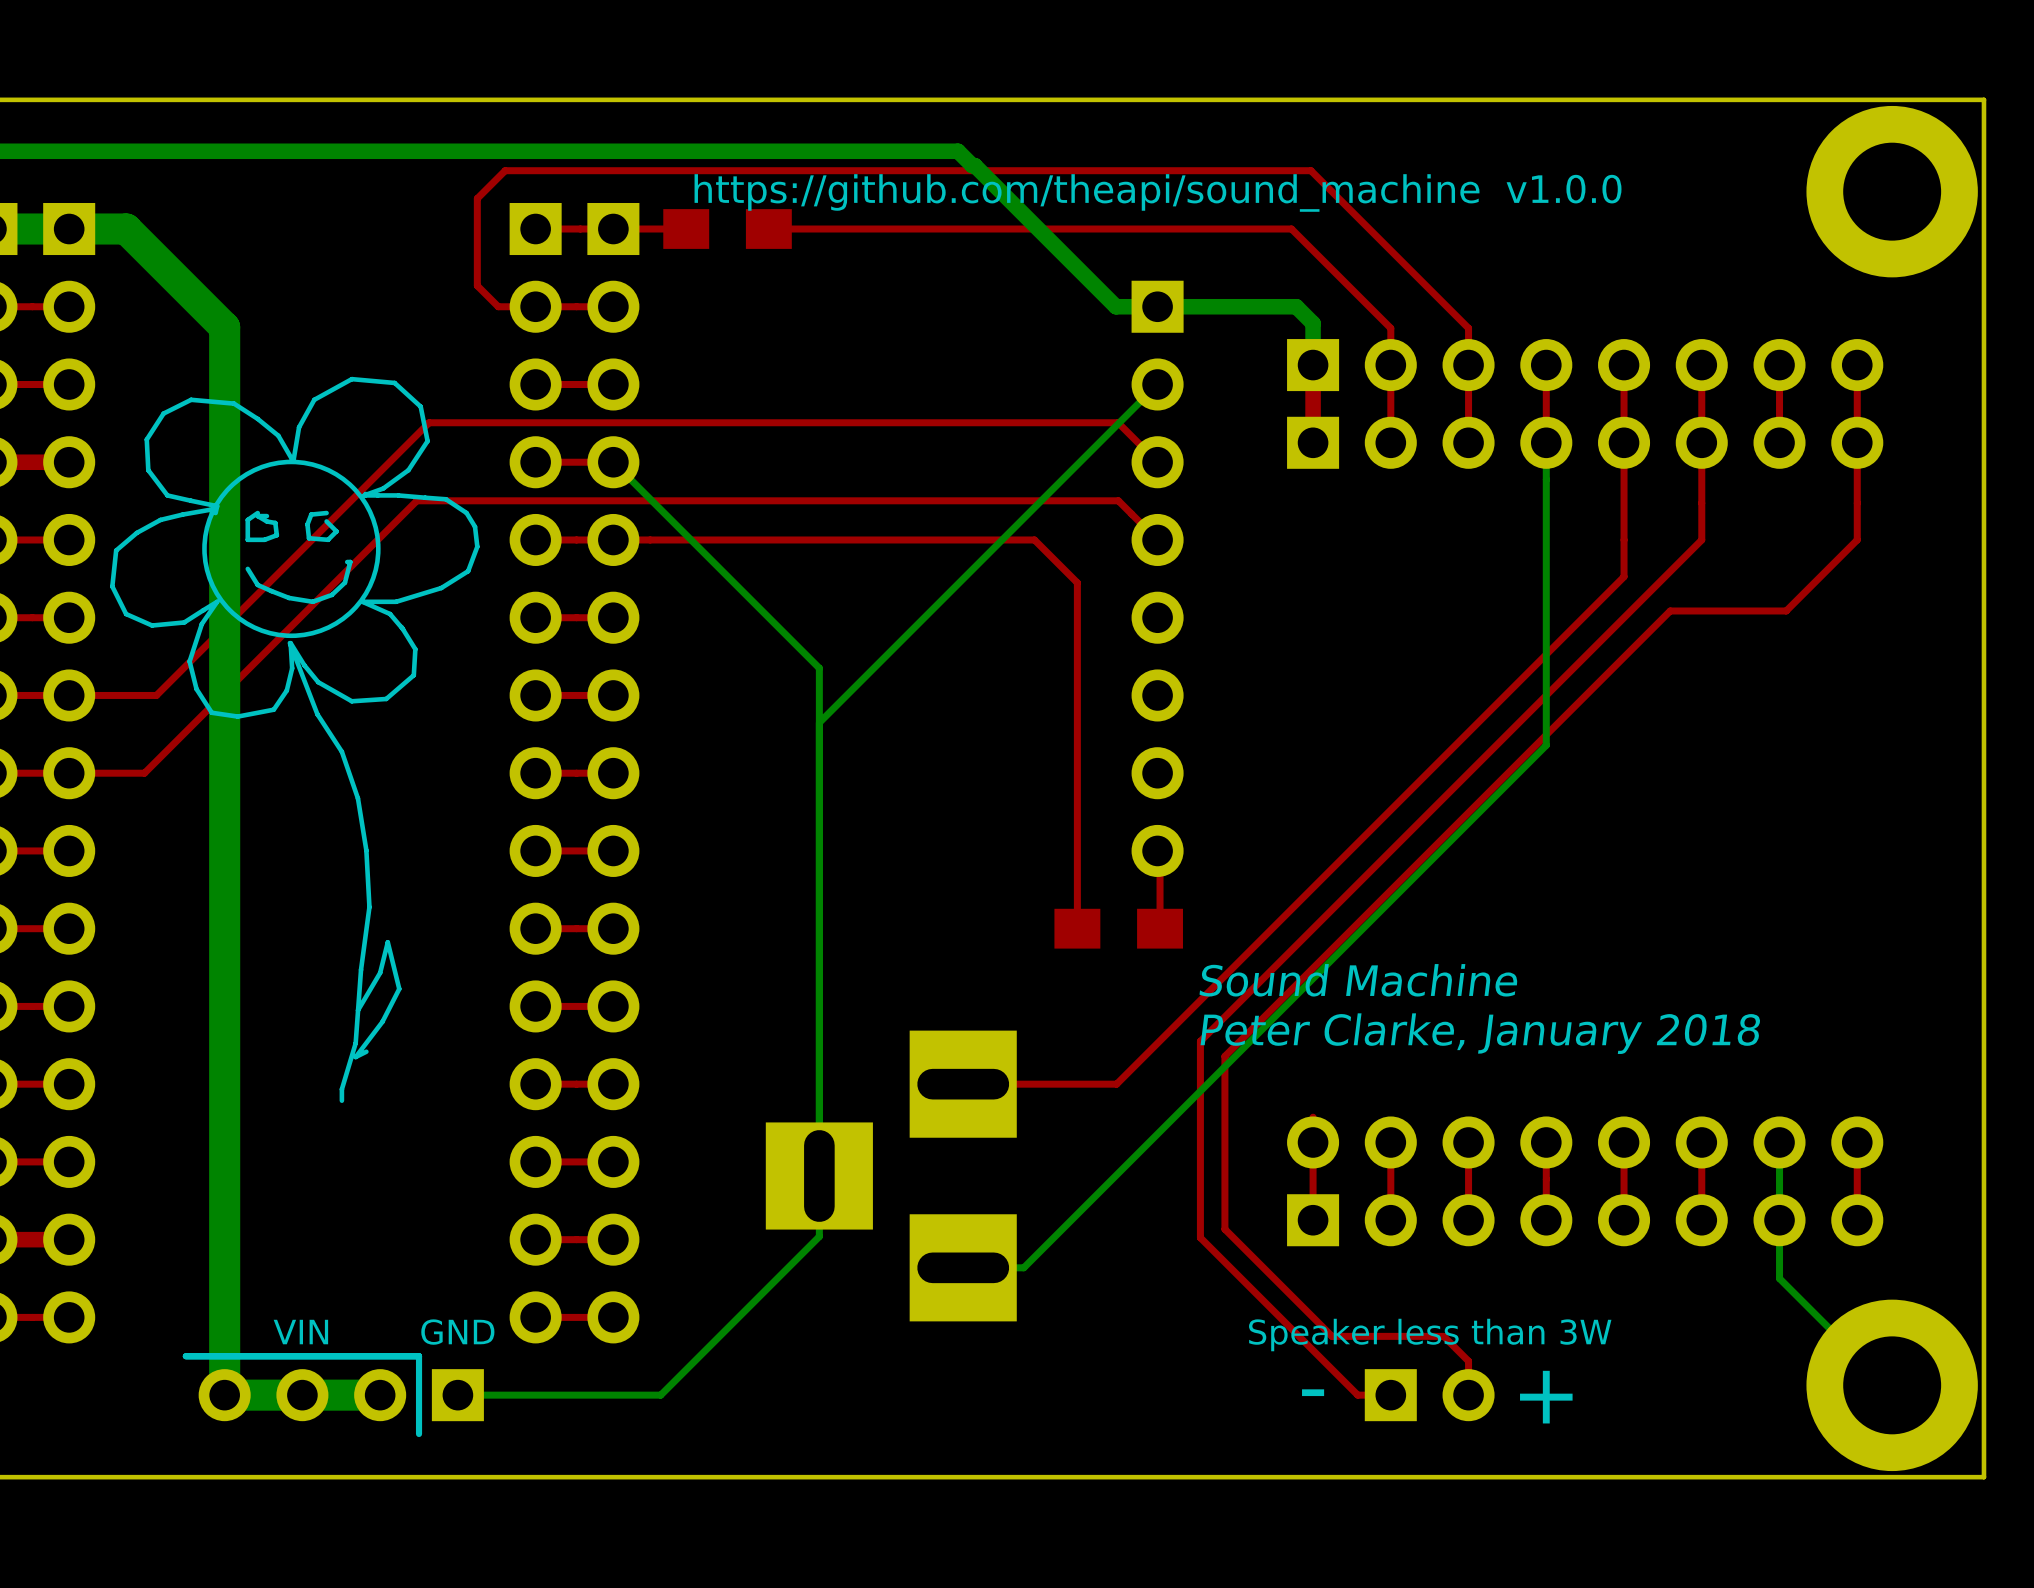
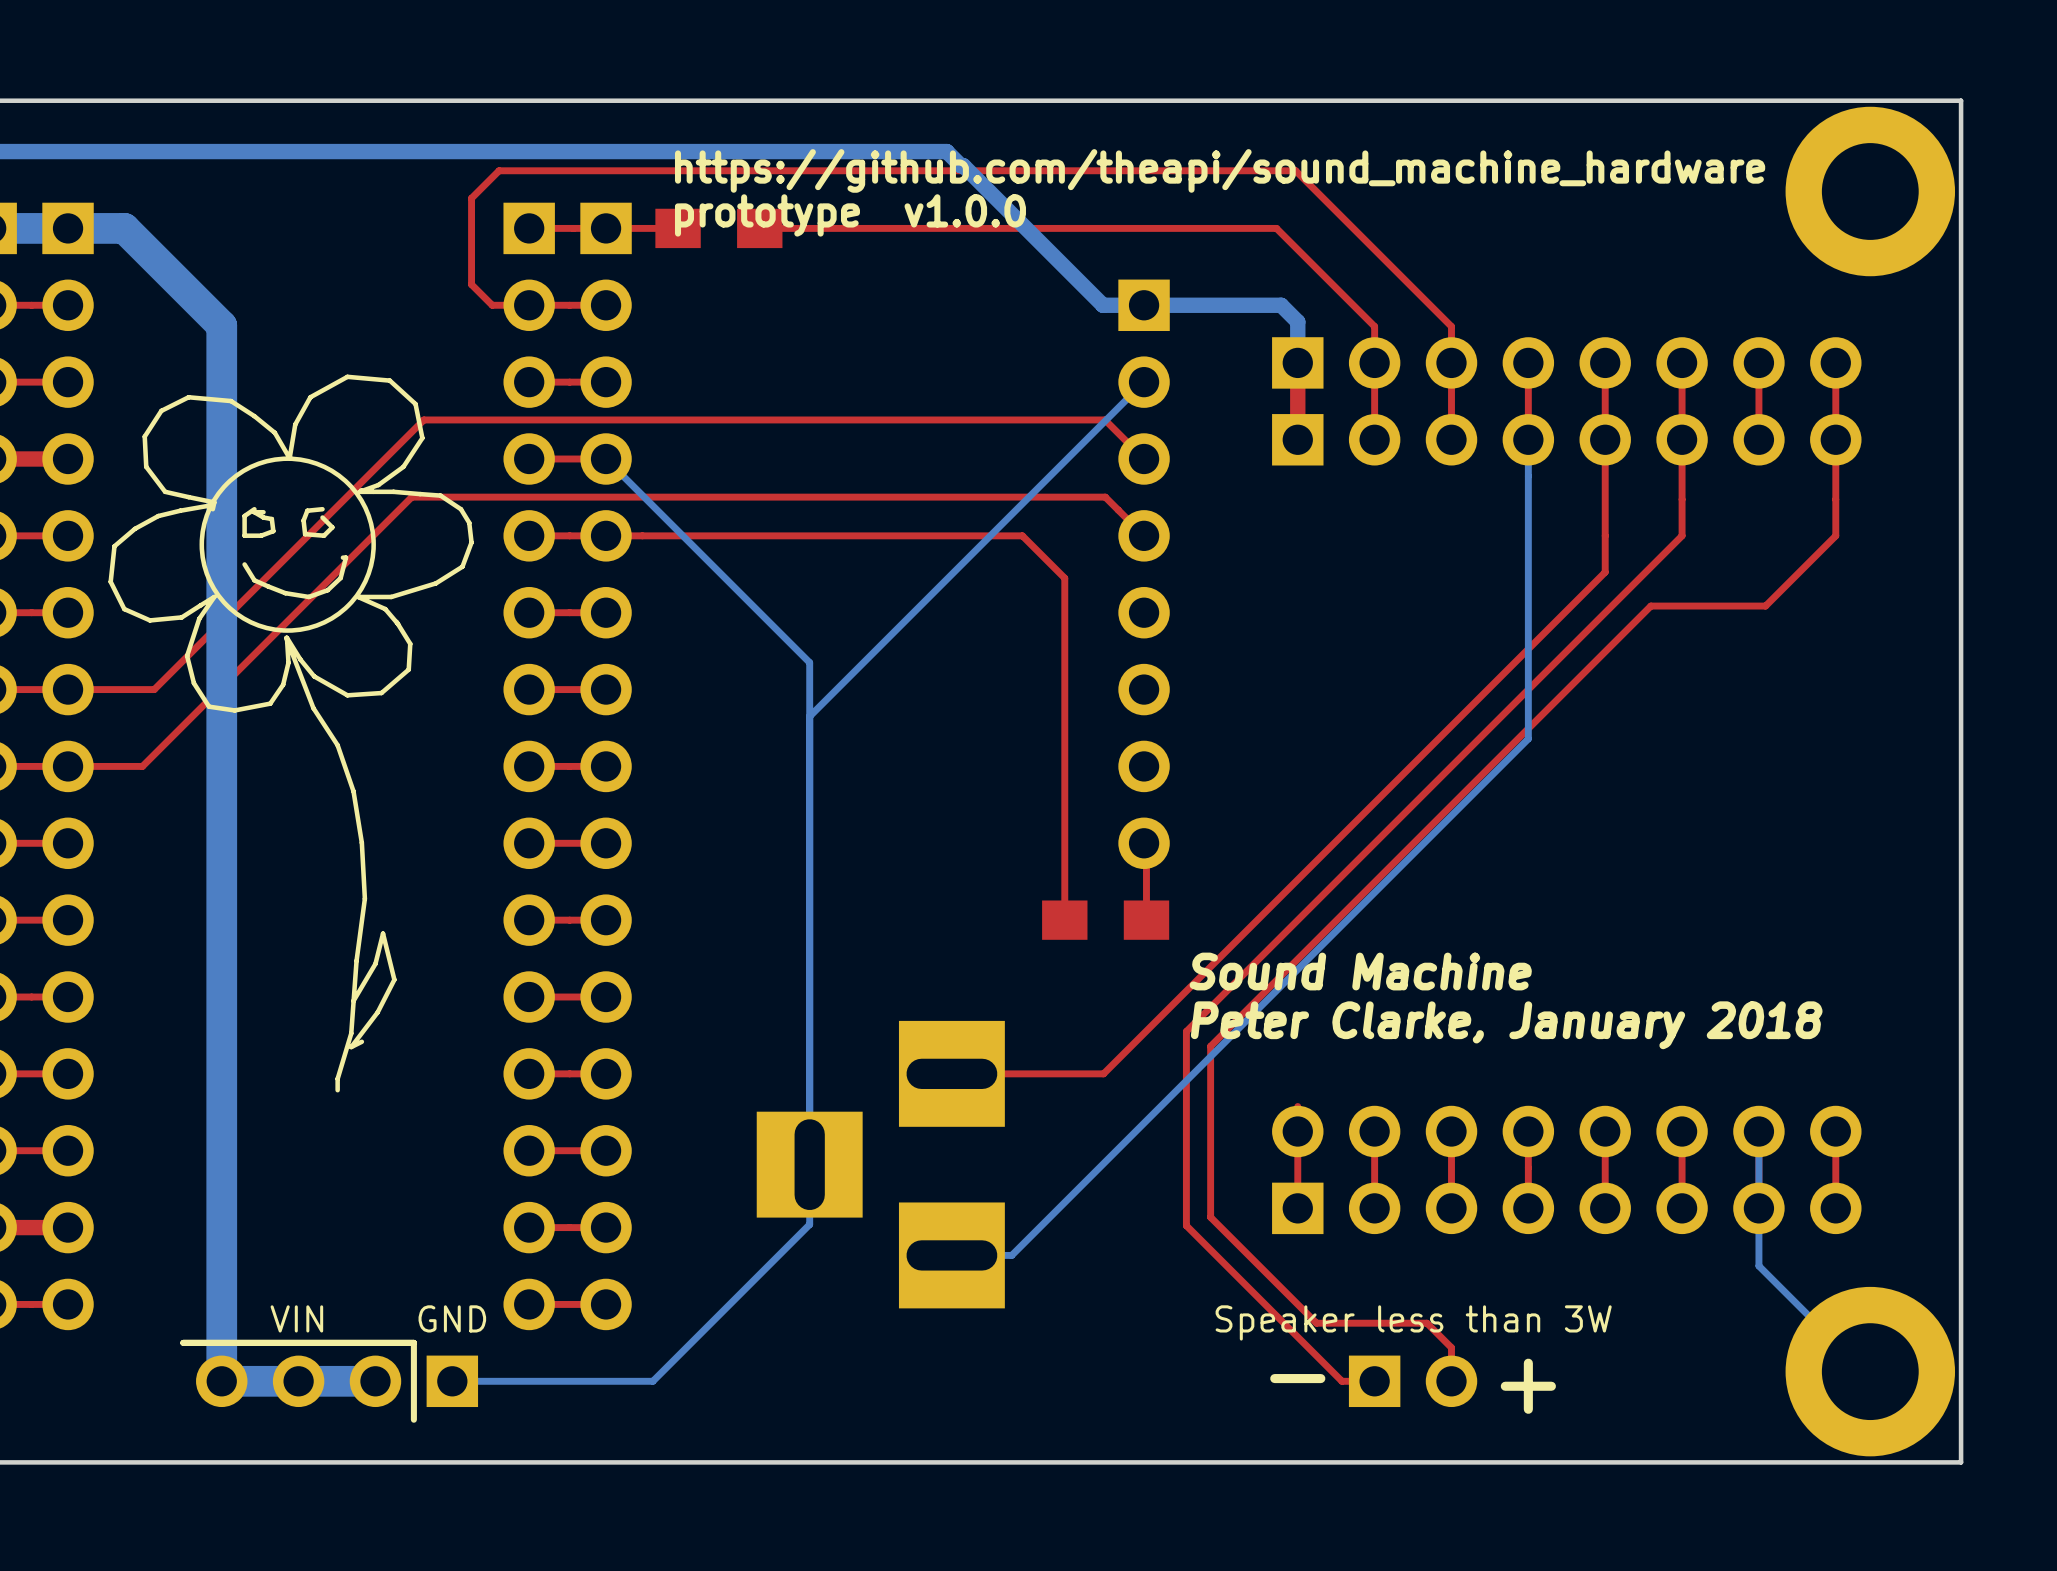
text: https://github.com/theapi/sound_machine v1.0.0 (1158, 192) -> https://github.com/theapi/sound_machine_hardware (1220, 170)
text: none -> prototype v1.0.0 (850, 215)

